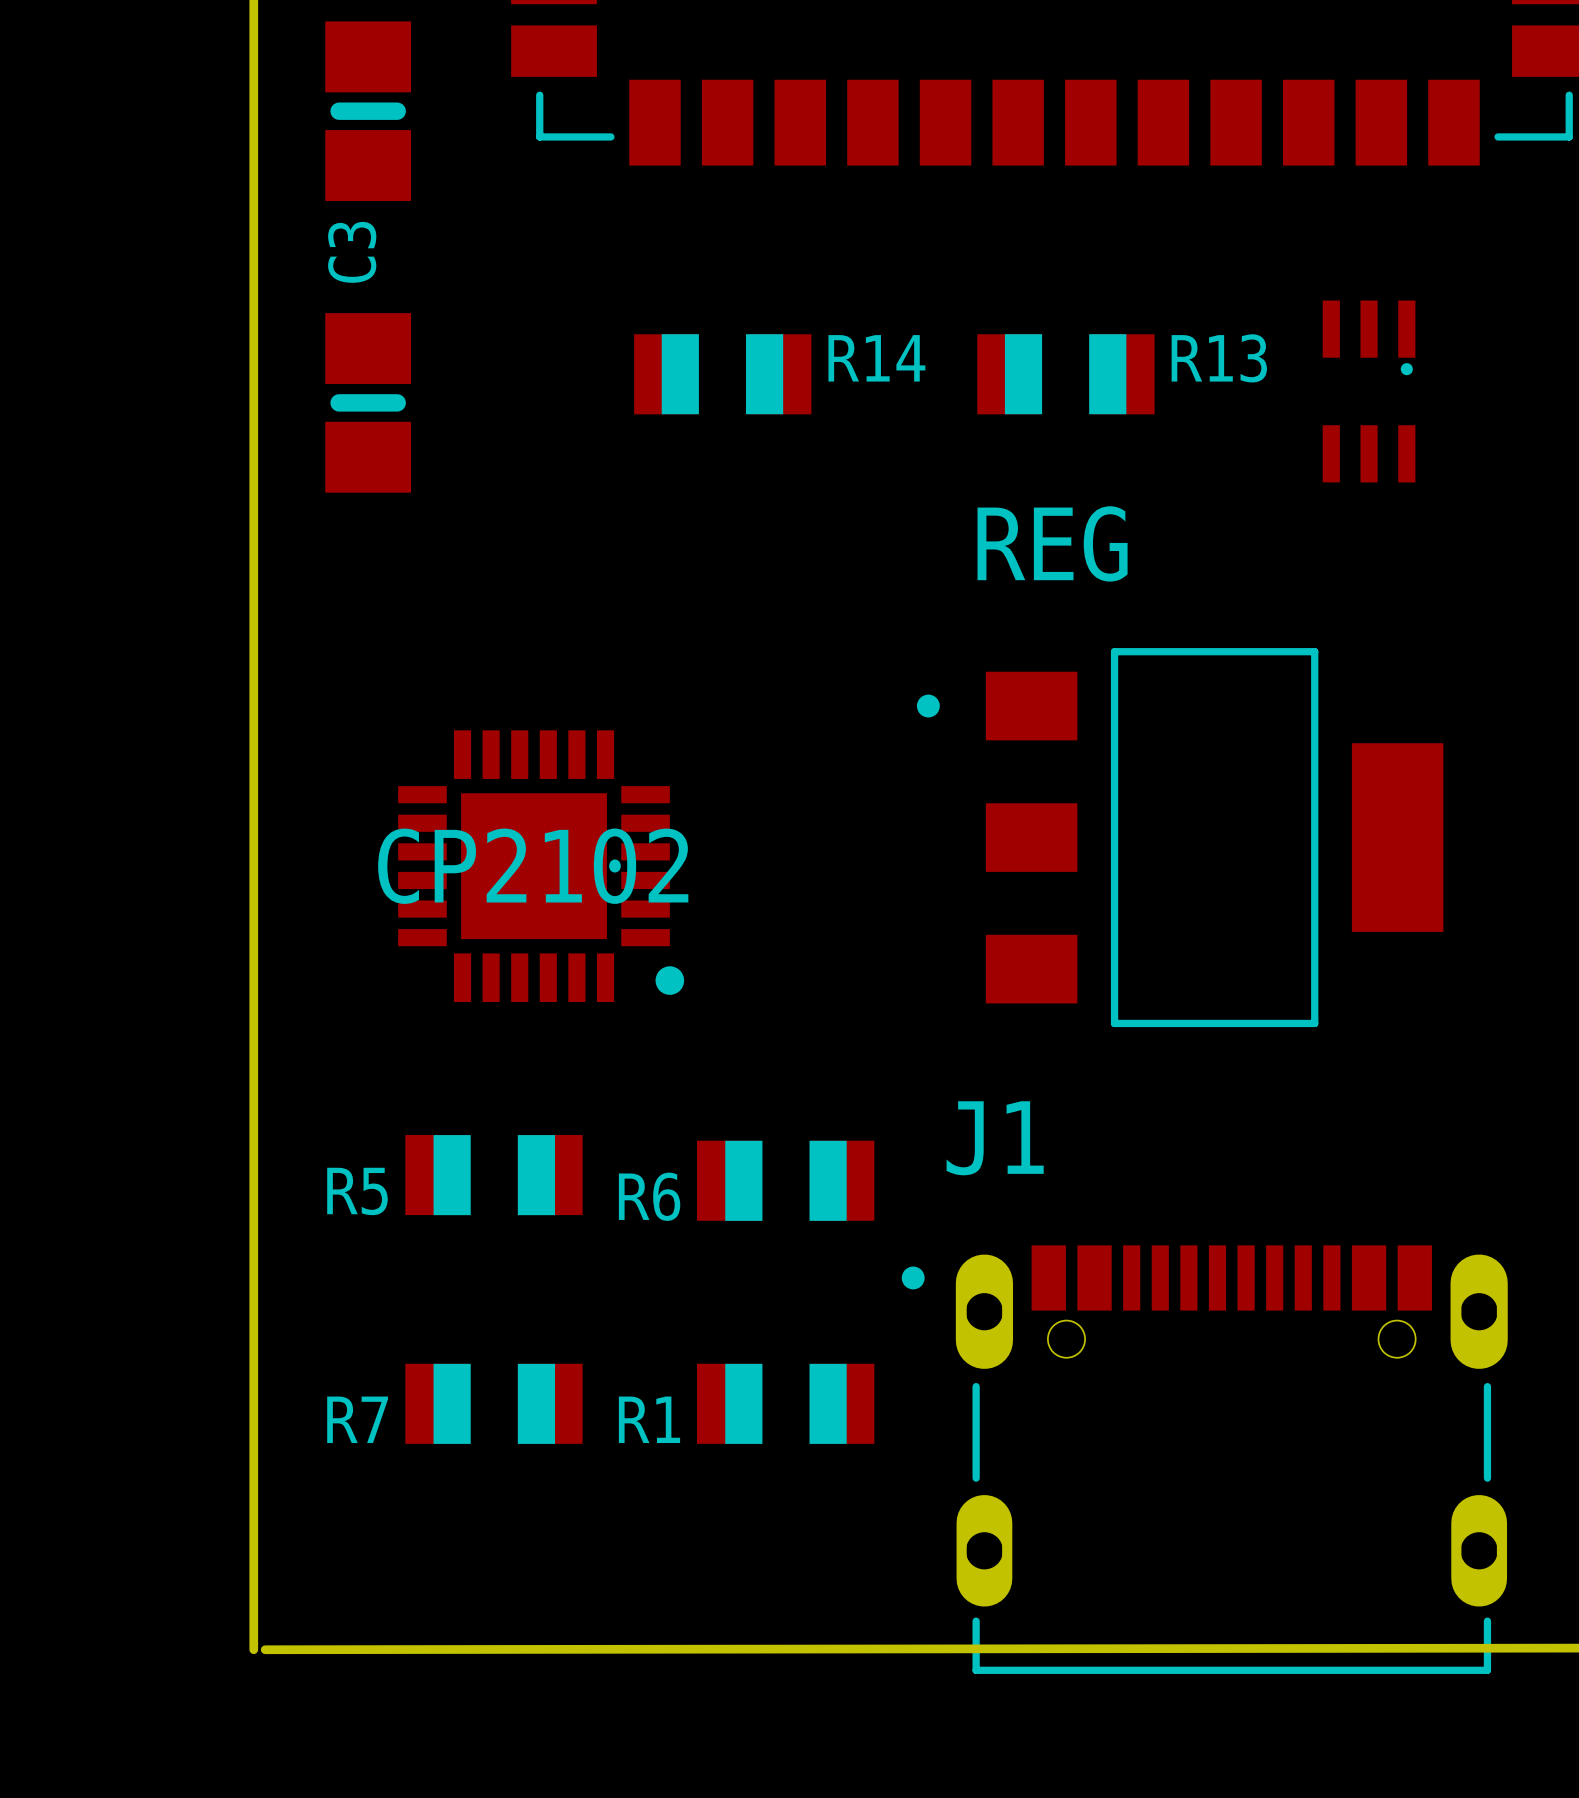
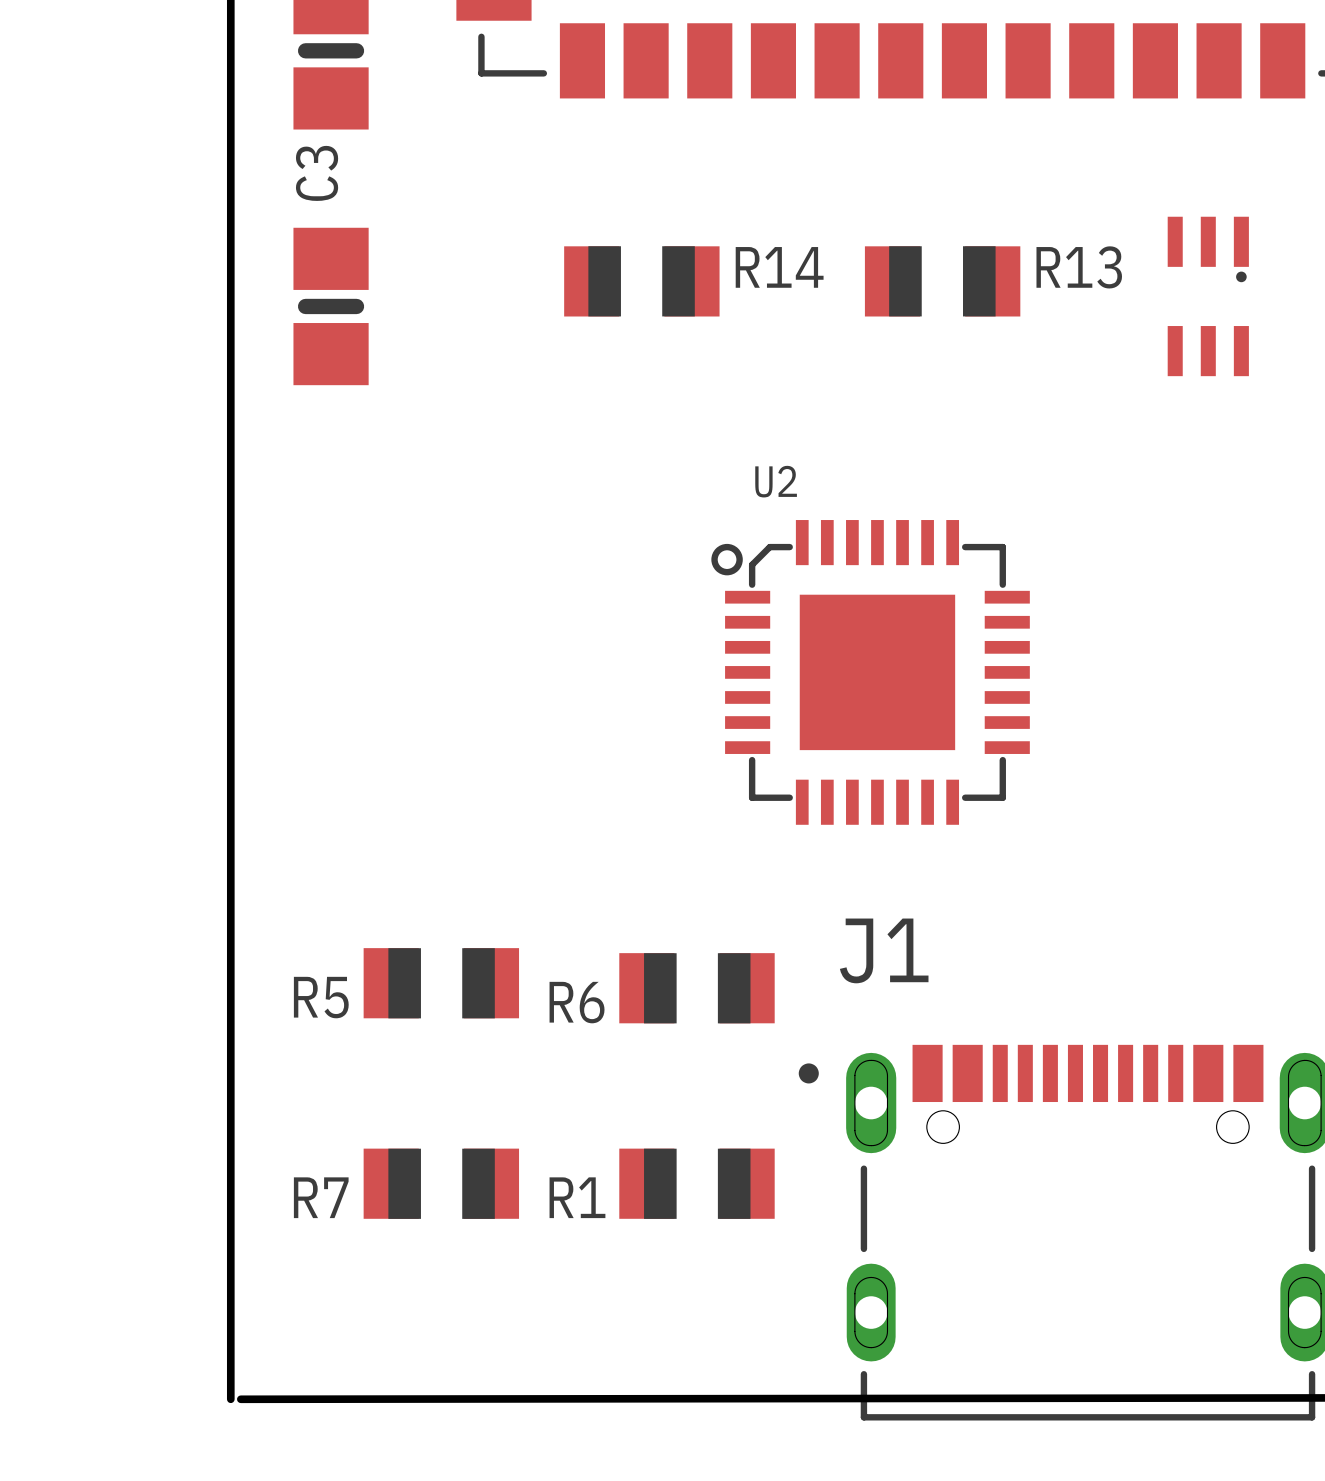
U2: none -> (870, 672)
REG: (1180, 837) -> none
CP2102: (541, 866) -> none

